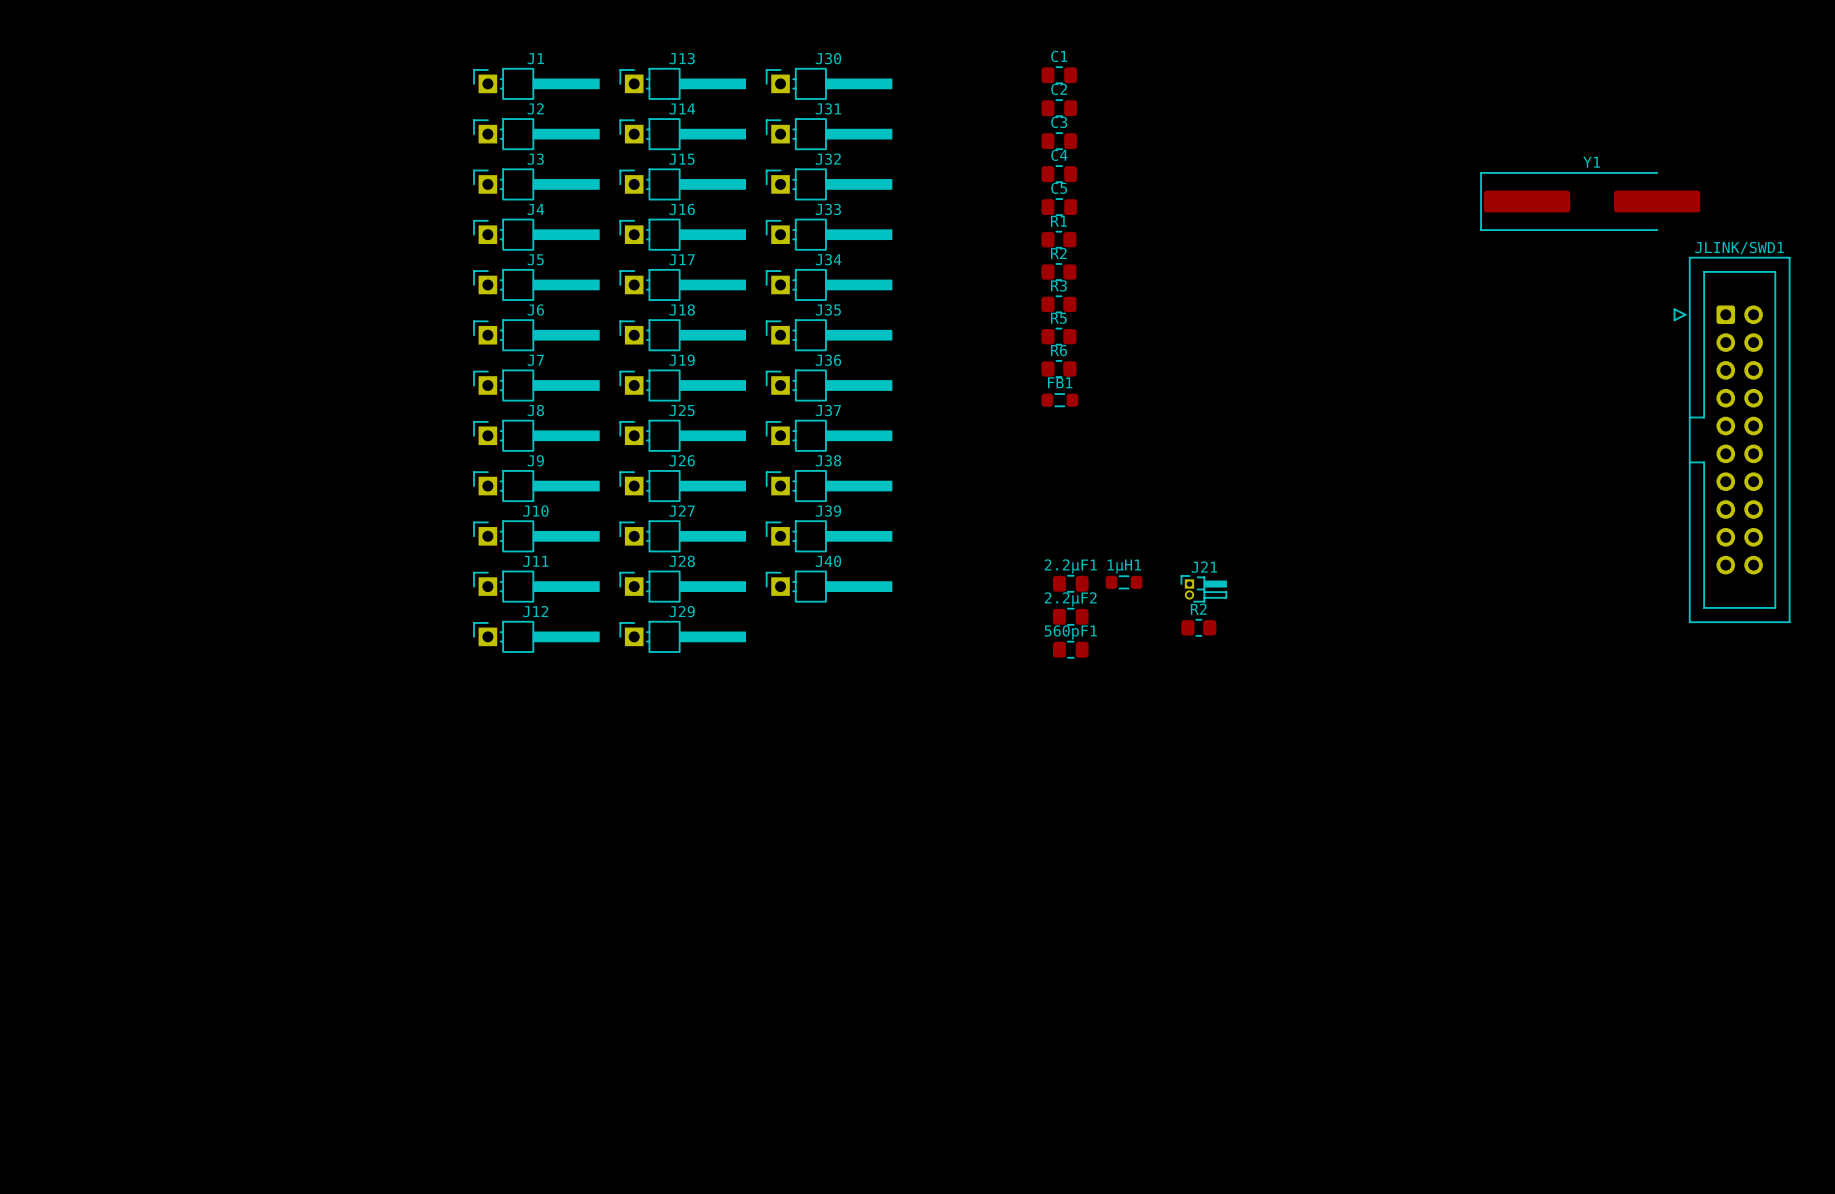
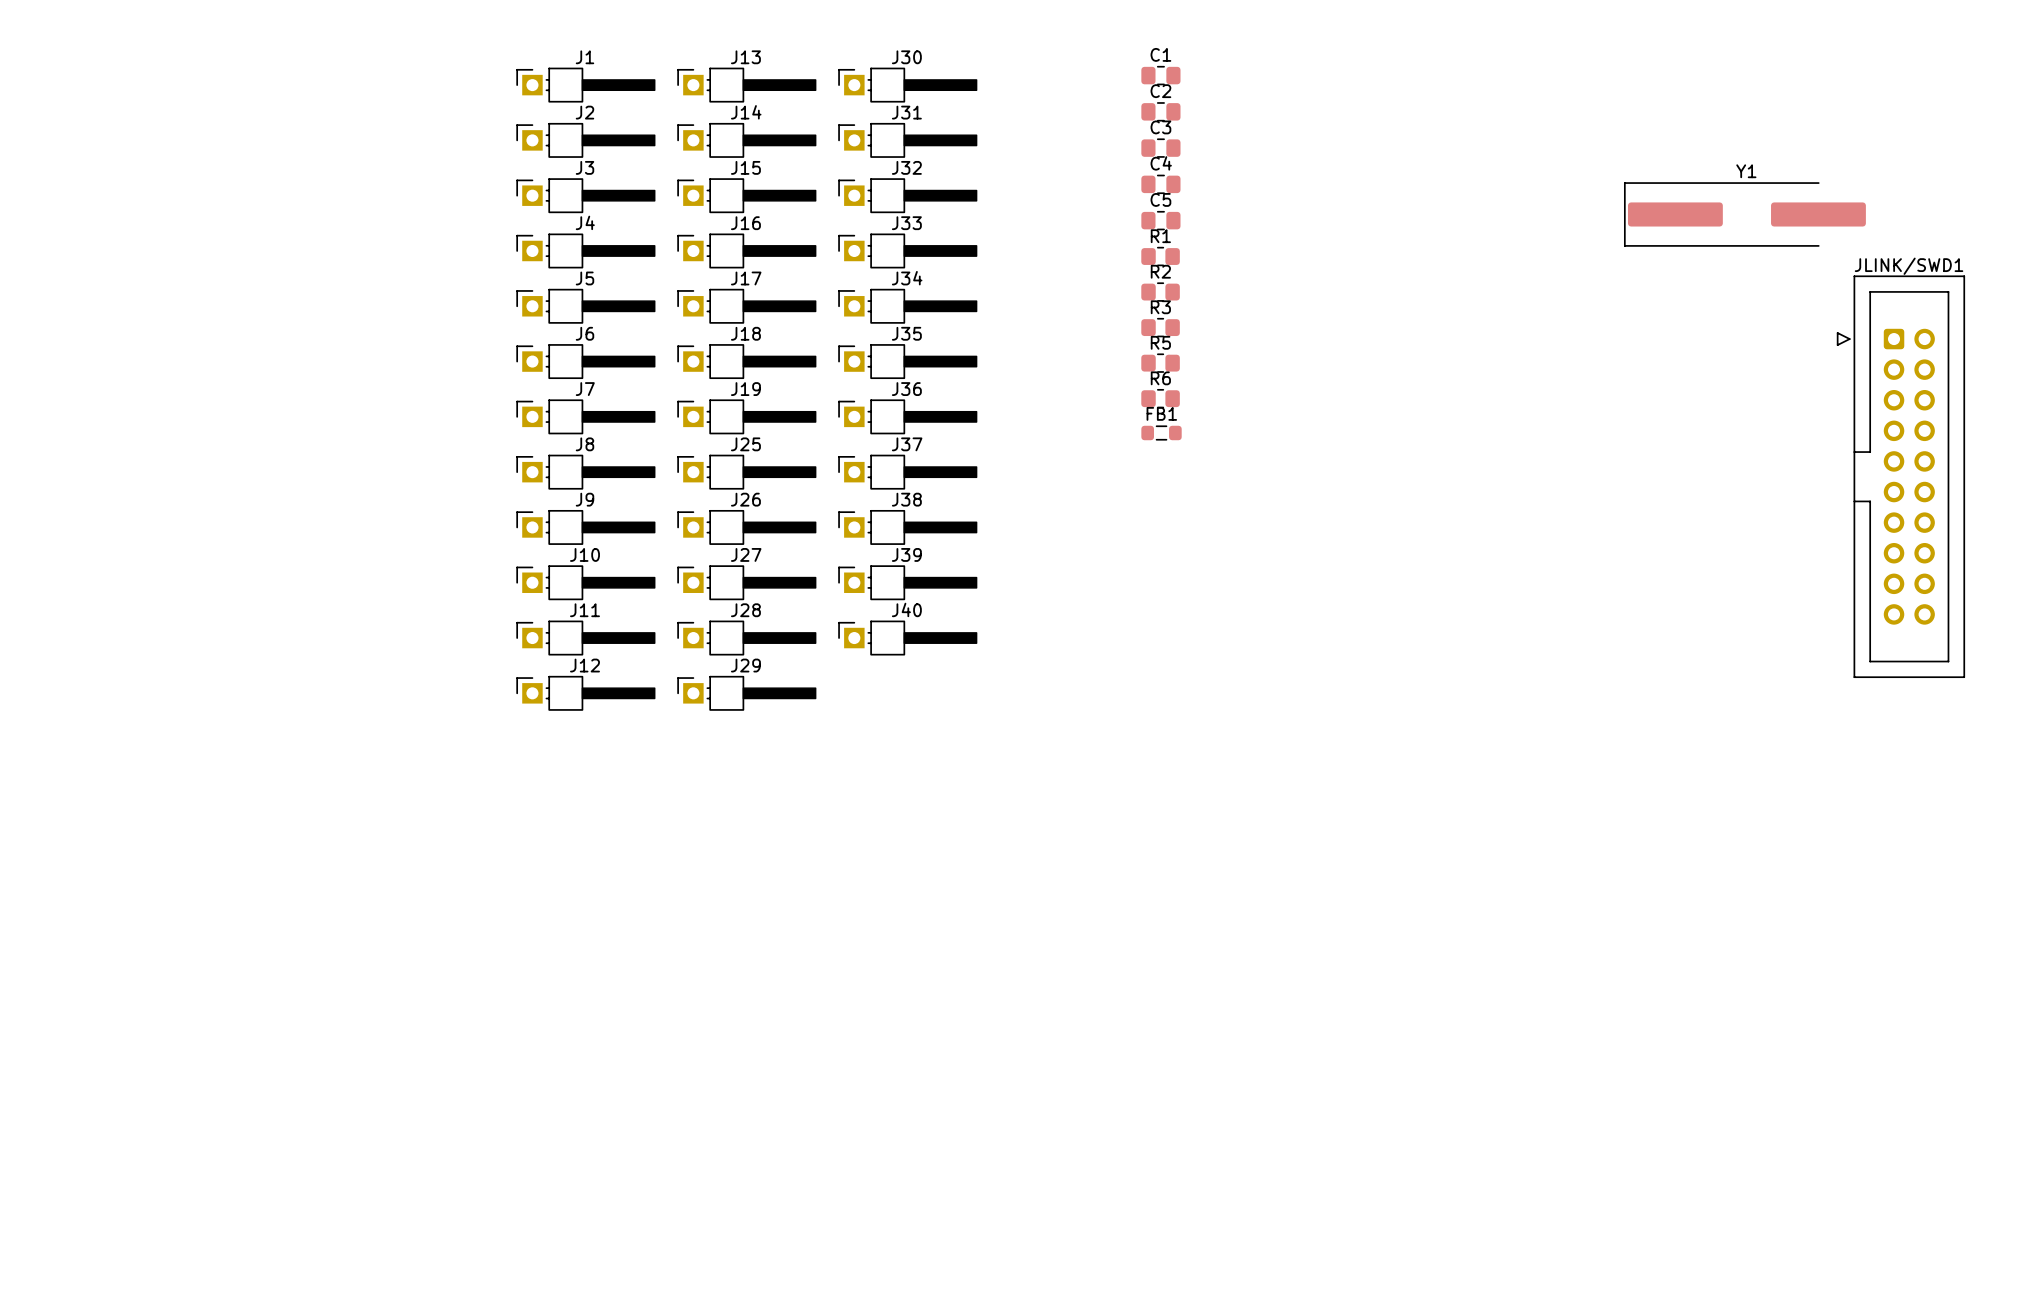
1µH1: (1124, 582) -> none
2.2µF1: (1070, 583) -> none
J21: (1203, 588) -> none
2.2µF2: (1070, 616) -> none
R2: (1198, 627) -> none
560pF1: (1070, 649) -> none

